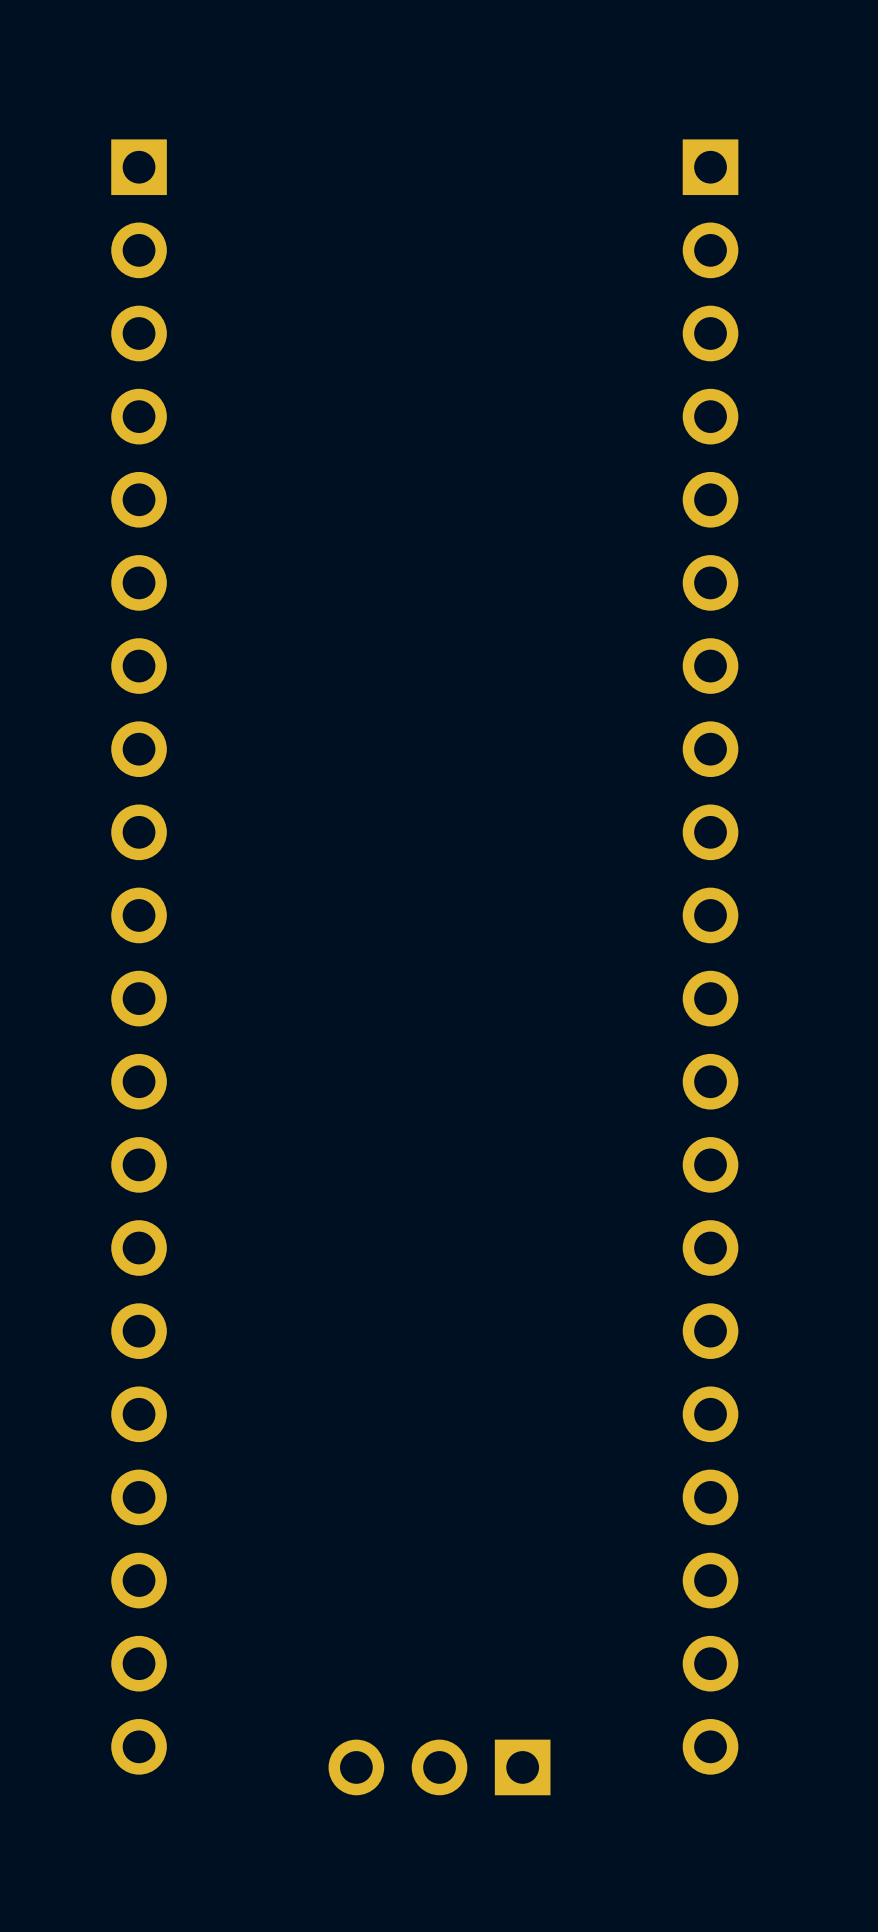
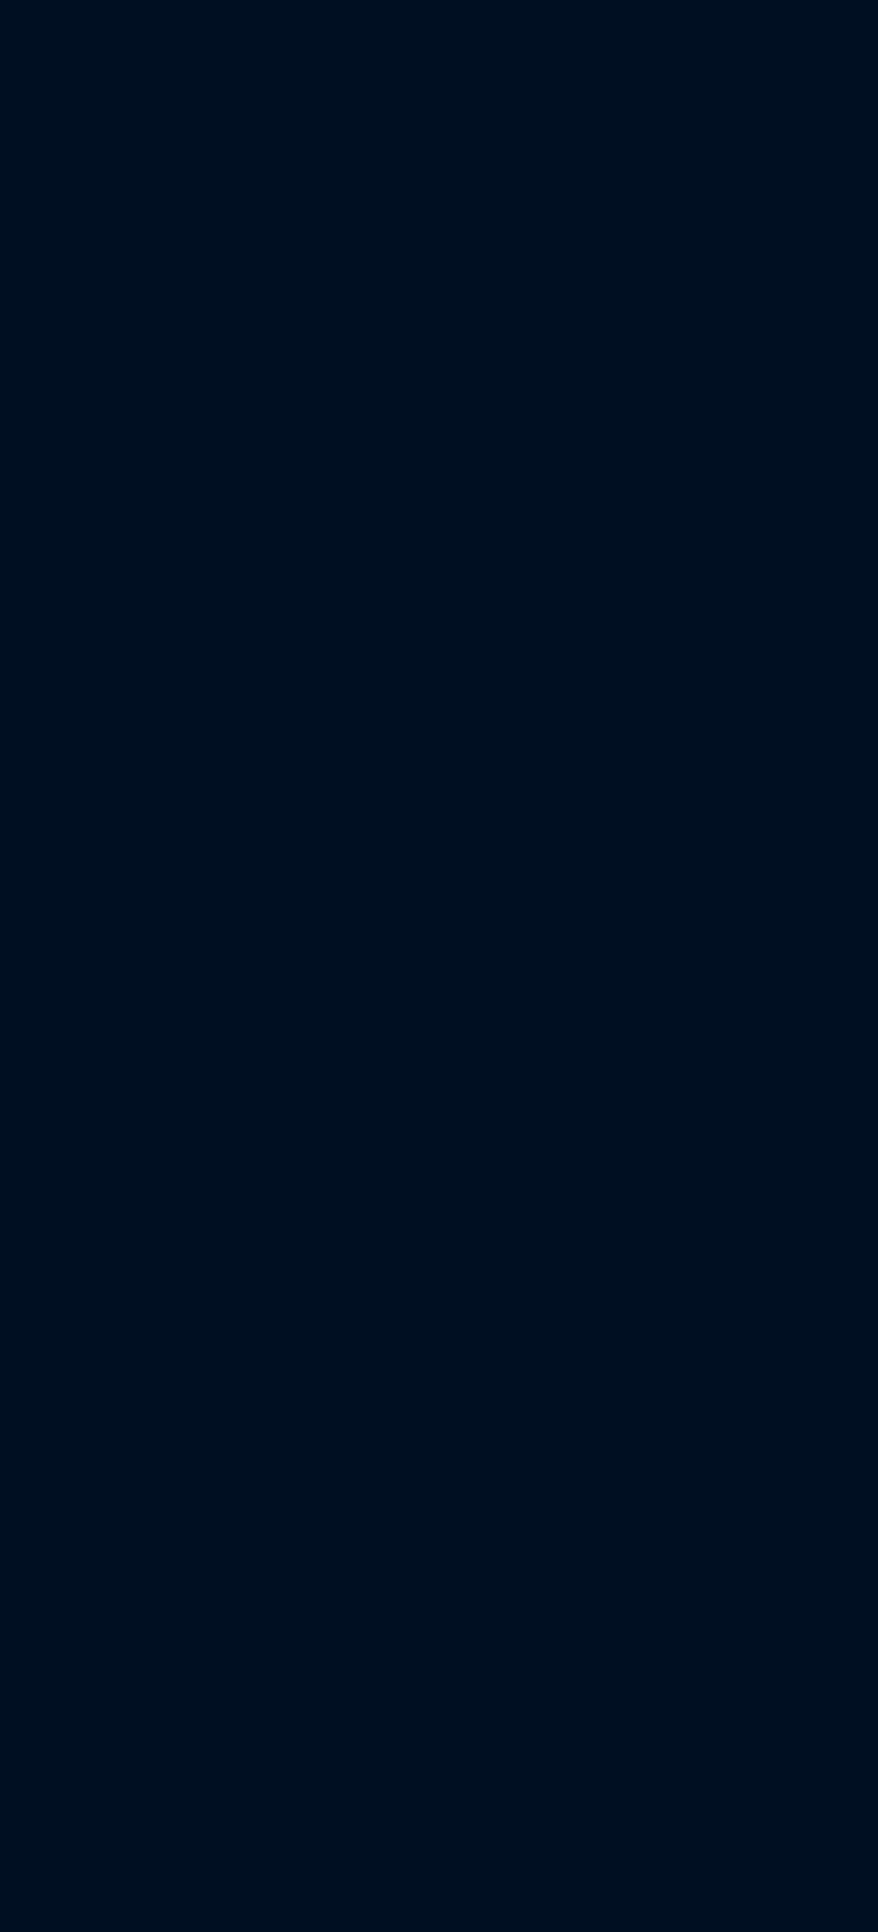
part: (139, 957) -> none
part: (710, 957) -> none
part: (439, 1767) -> none

